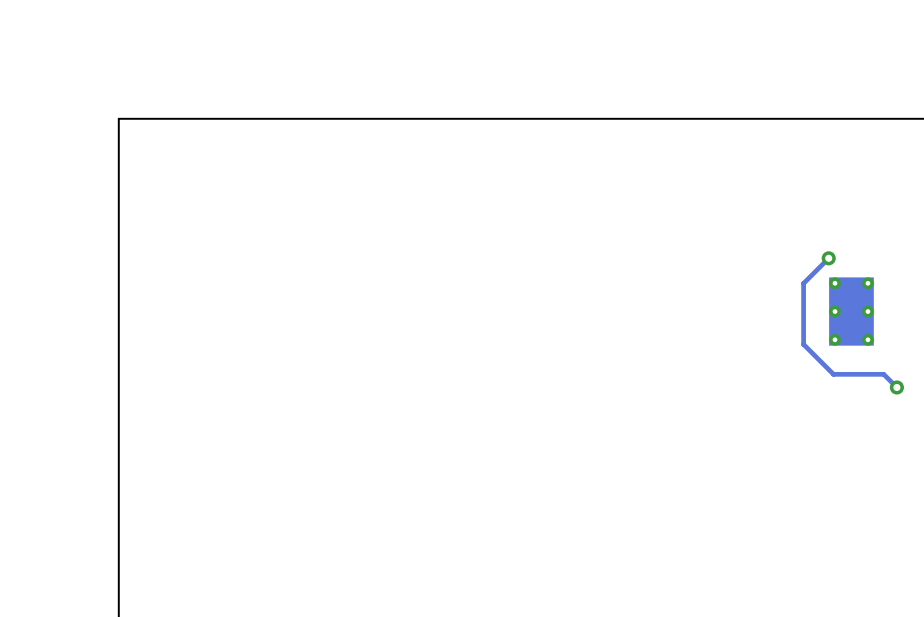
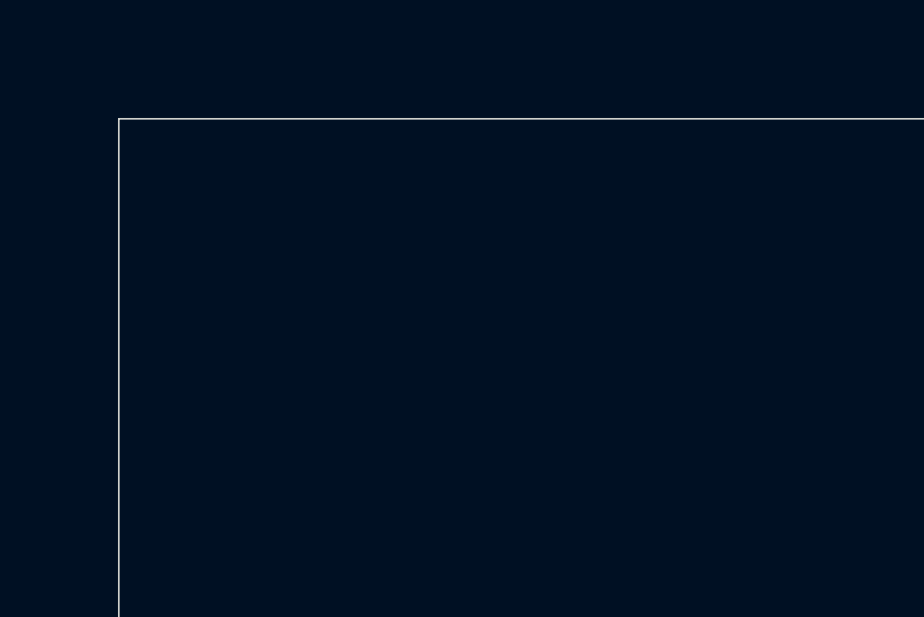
track: (828, 258) (803, 283) (803, 344) (833, 374) (883, 374) (896, 387) -> none
via: (828, 258) -> none
part: (851, 311) -> none
via: (896, 387) -> none

